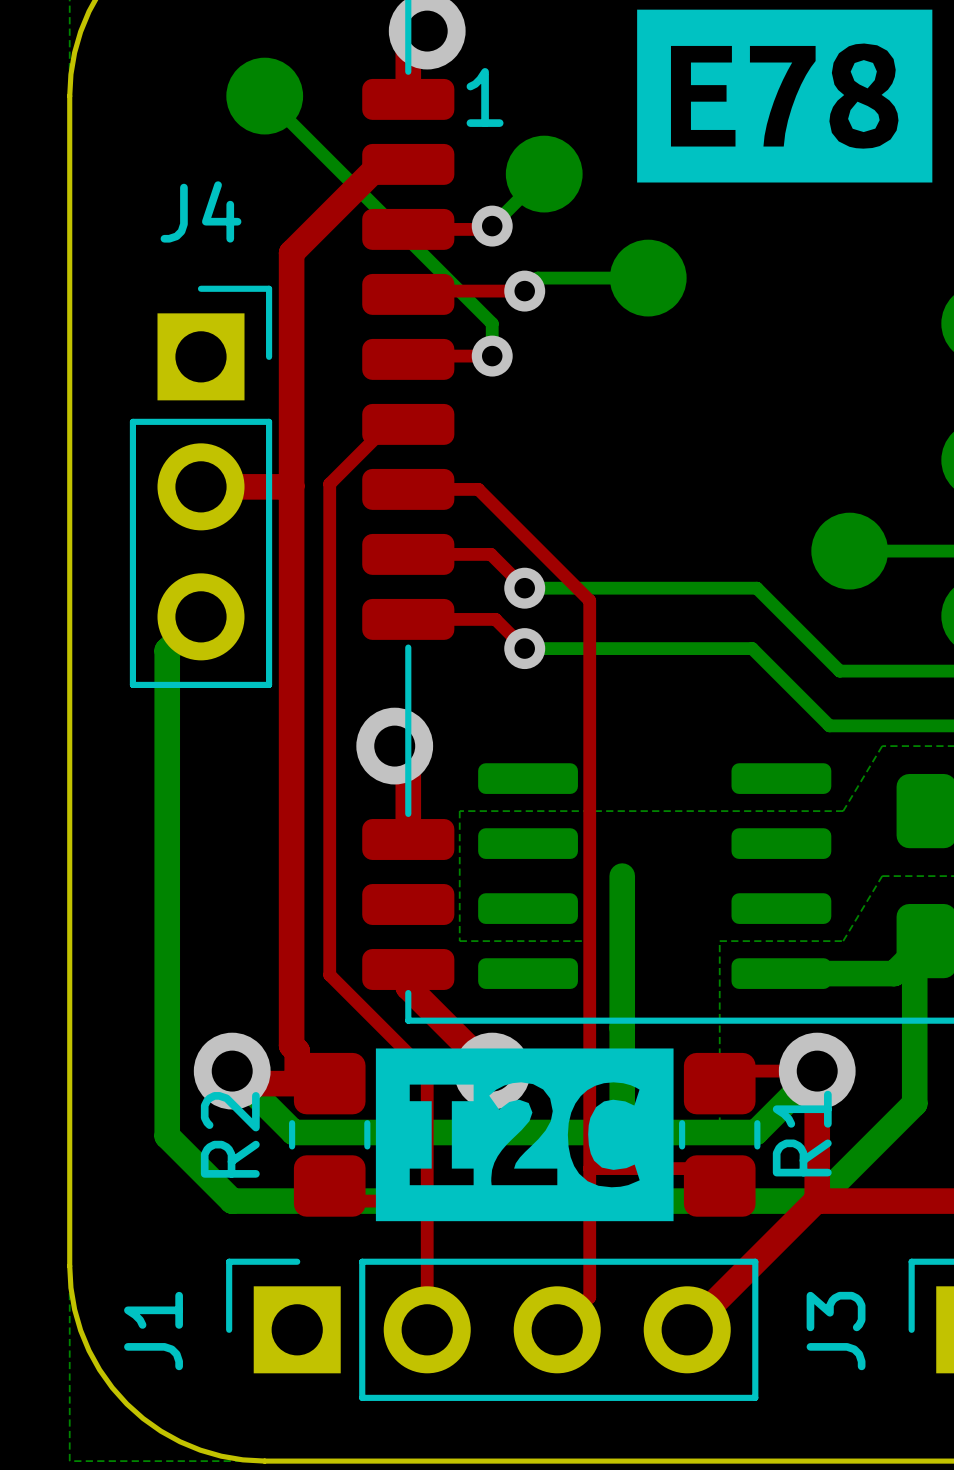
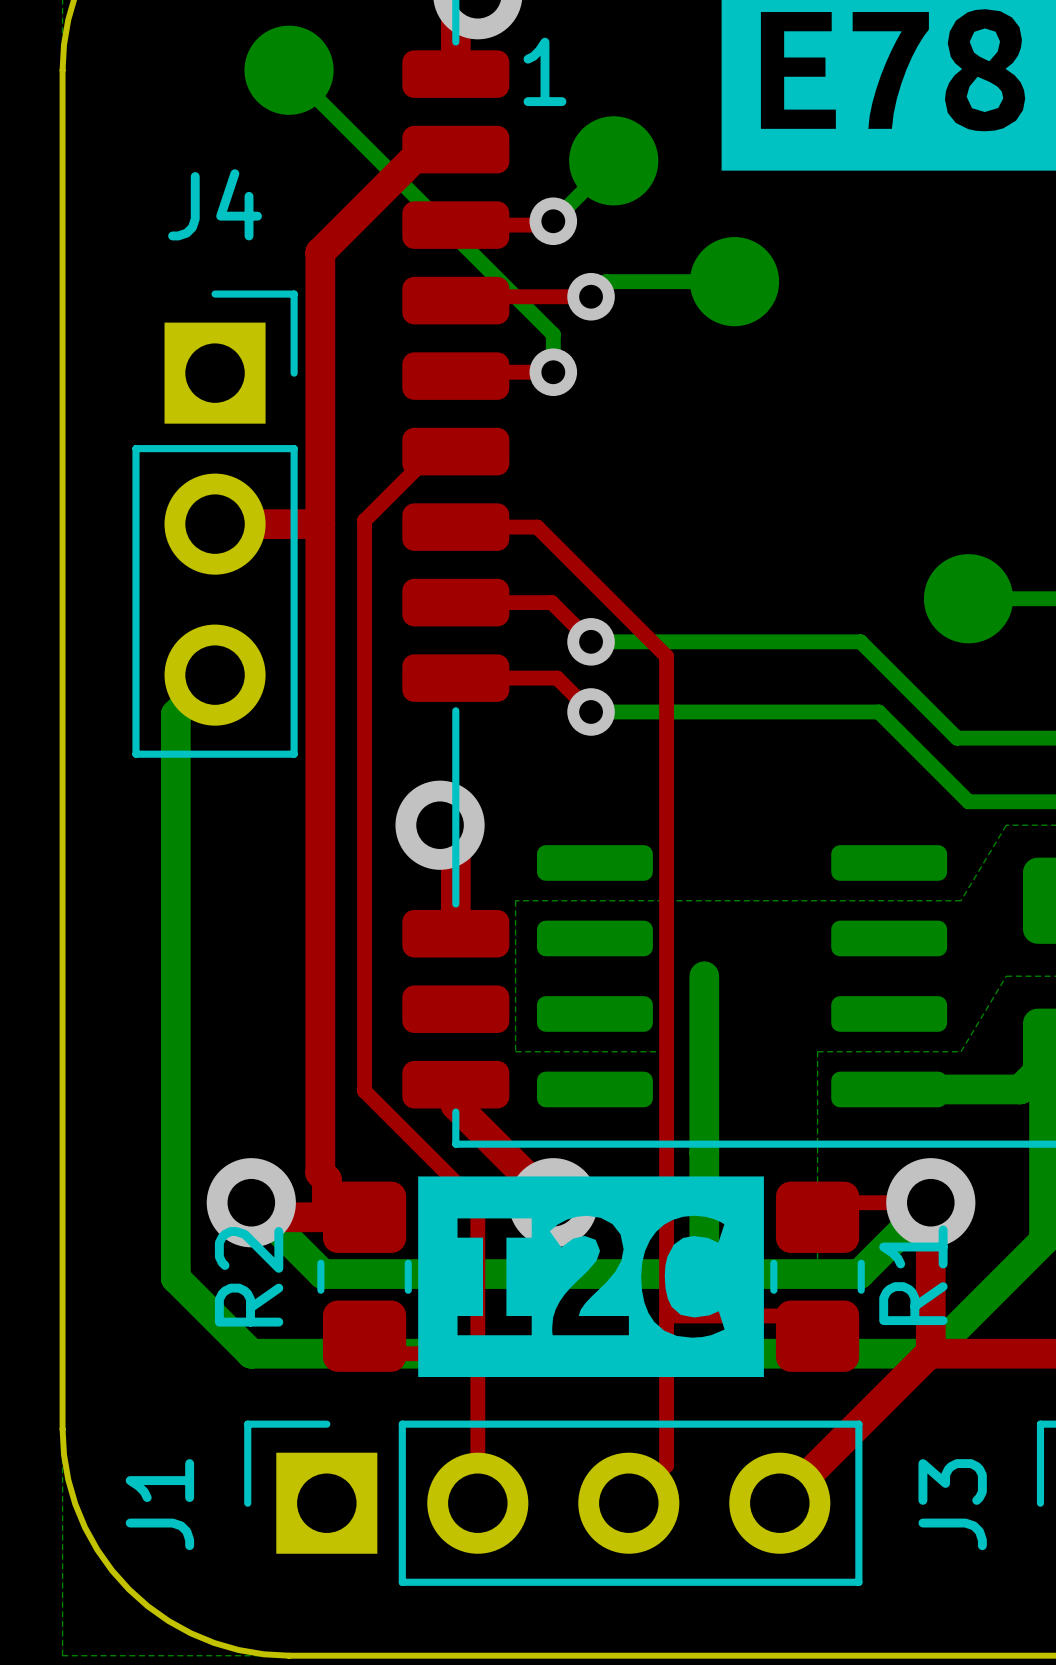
bottom track: (752, 648) (829, 725) (849, 725) -> (855, 711) (878, 711) (968, 801)

